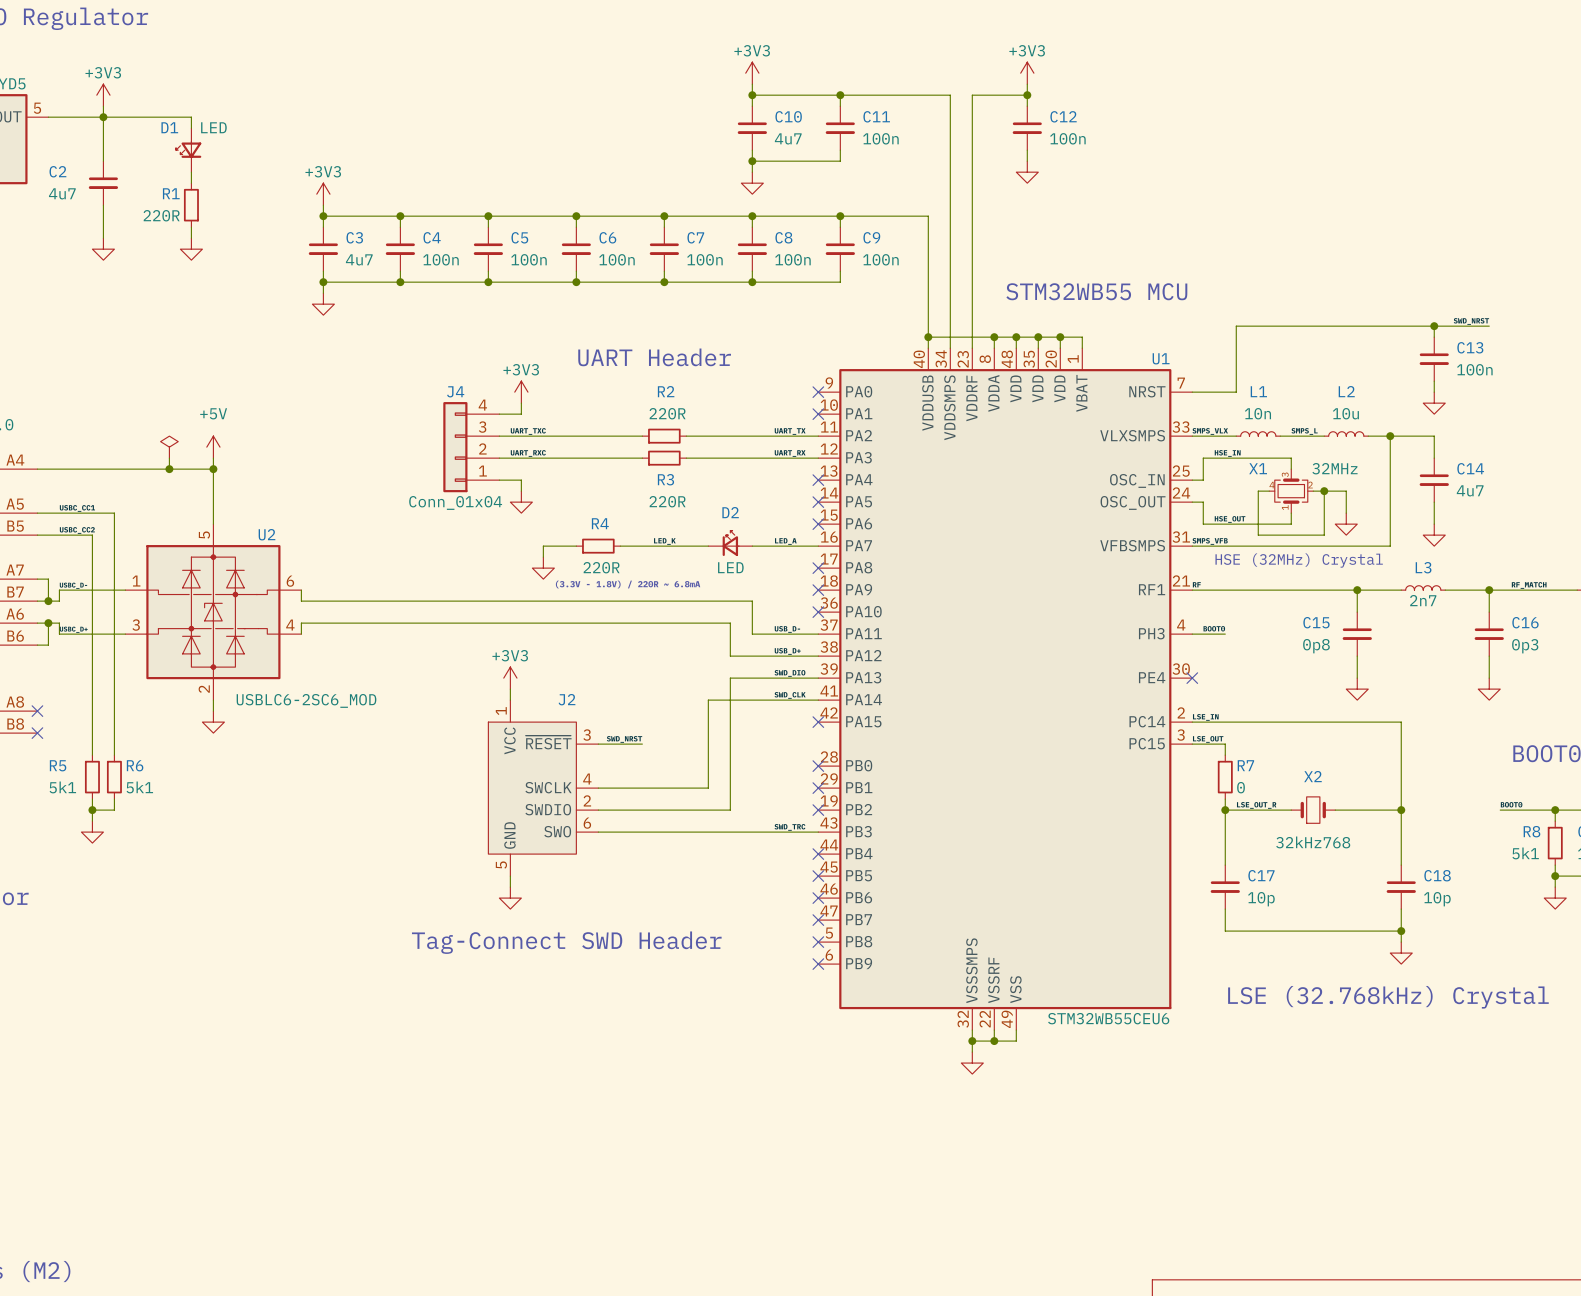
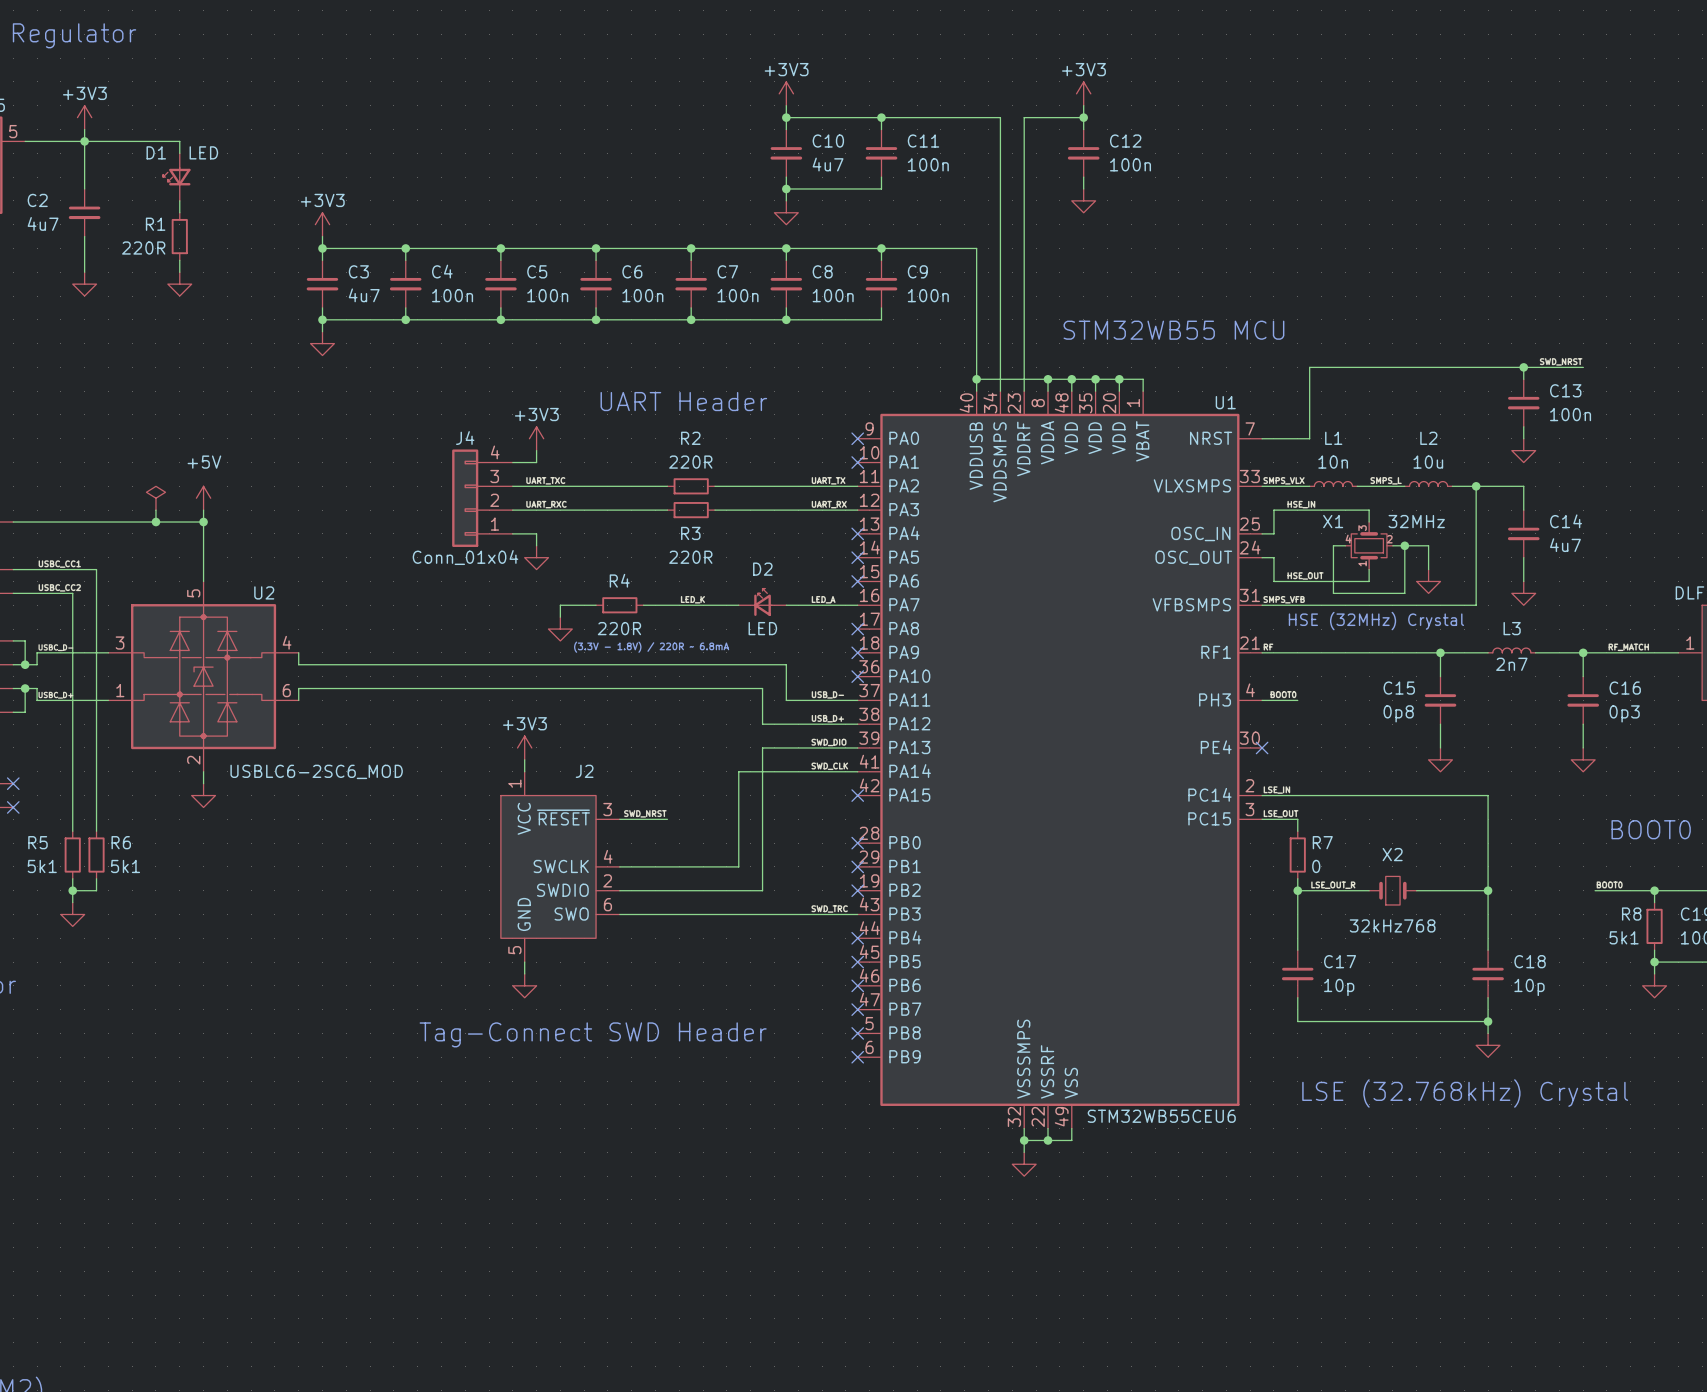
U2 pin number: 1 (136, 581) -> 3 (120, 643)
U2 pin number: 6 (290, 581) -> 4 (287, 642)
U2 pin number: 3 (136, 625) -> 1 (120, 690)
U2 pin number: 4 (290, 625) -> 6 (286, 690)

